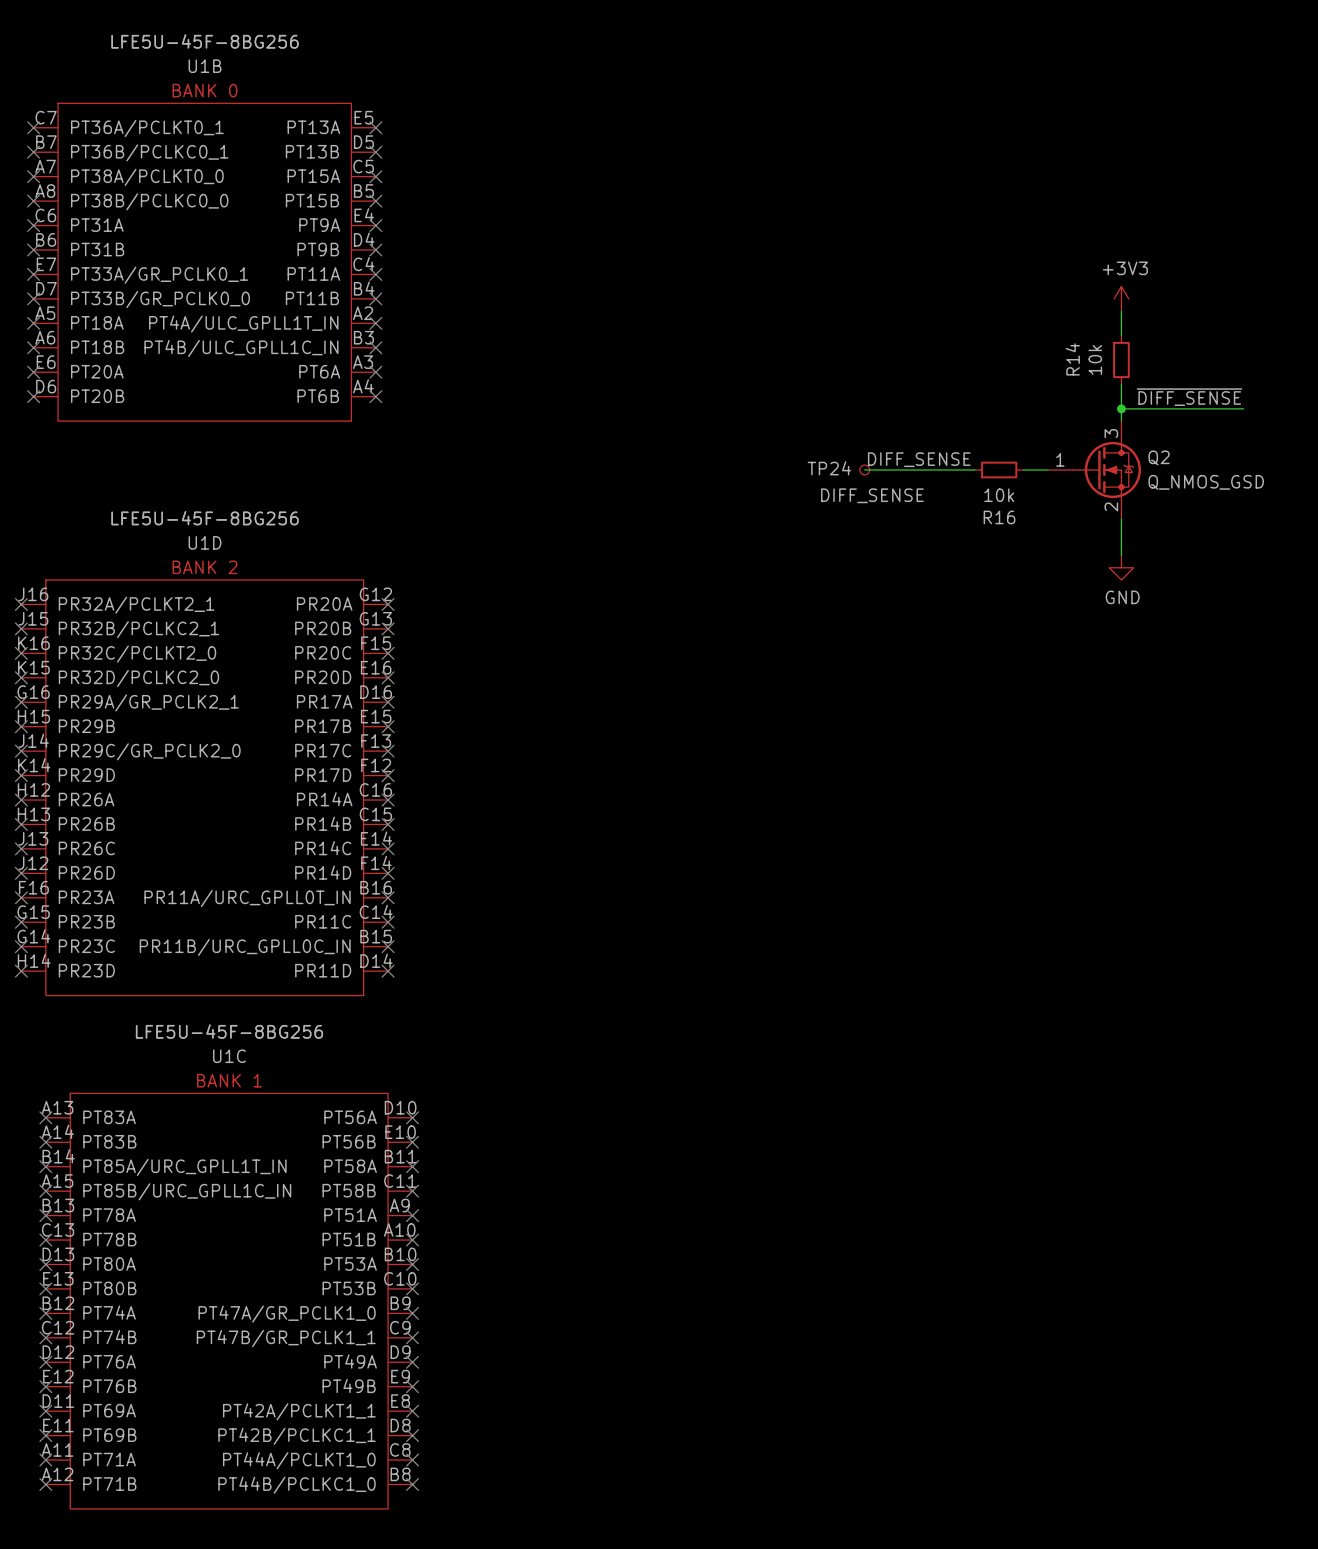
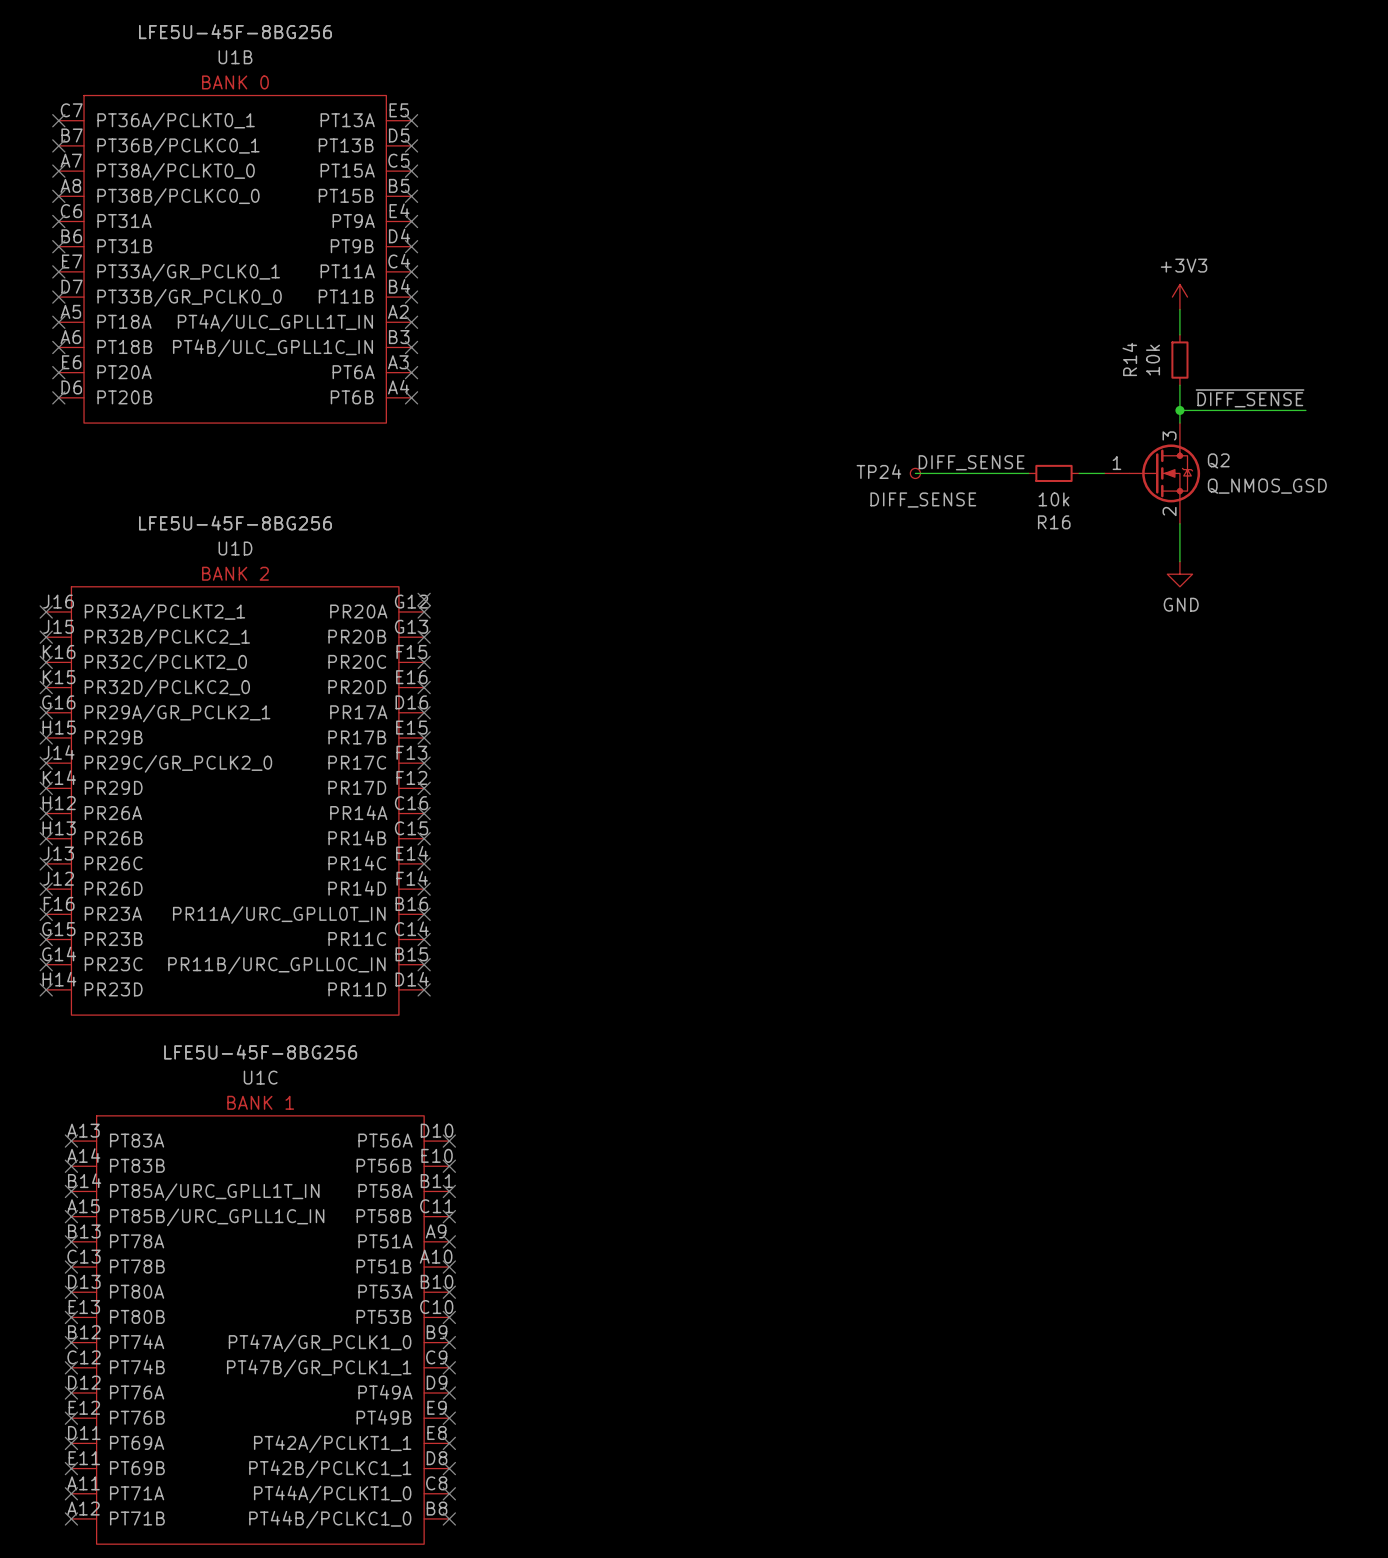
no-connect mark: none -> (424, 599)

